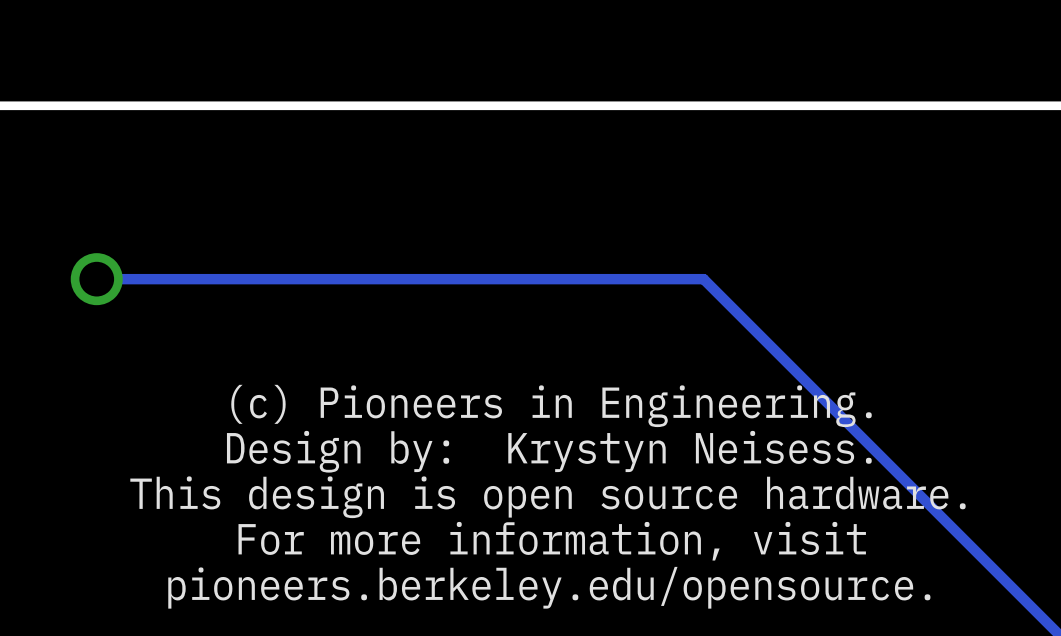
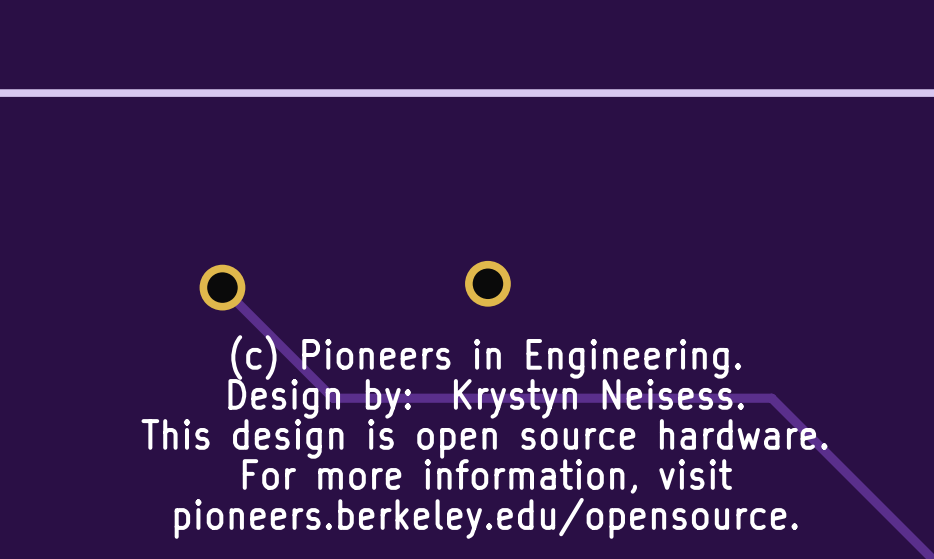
track: (96, 279) (703, 279) (877, 452) -> (222, 287) (333, 398) (771, 398)
part position: (96, 279) -> (222, 287)
part: none -> (487, 283)

